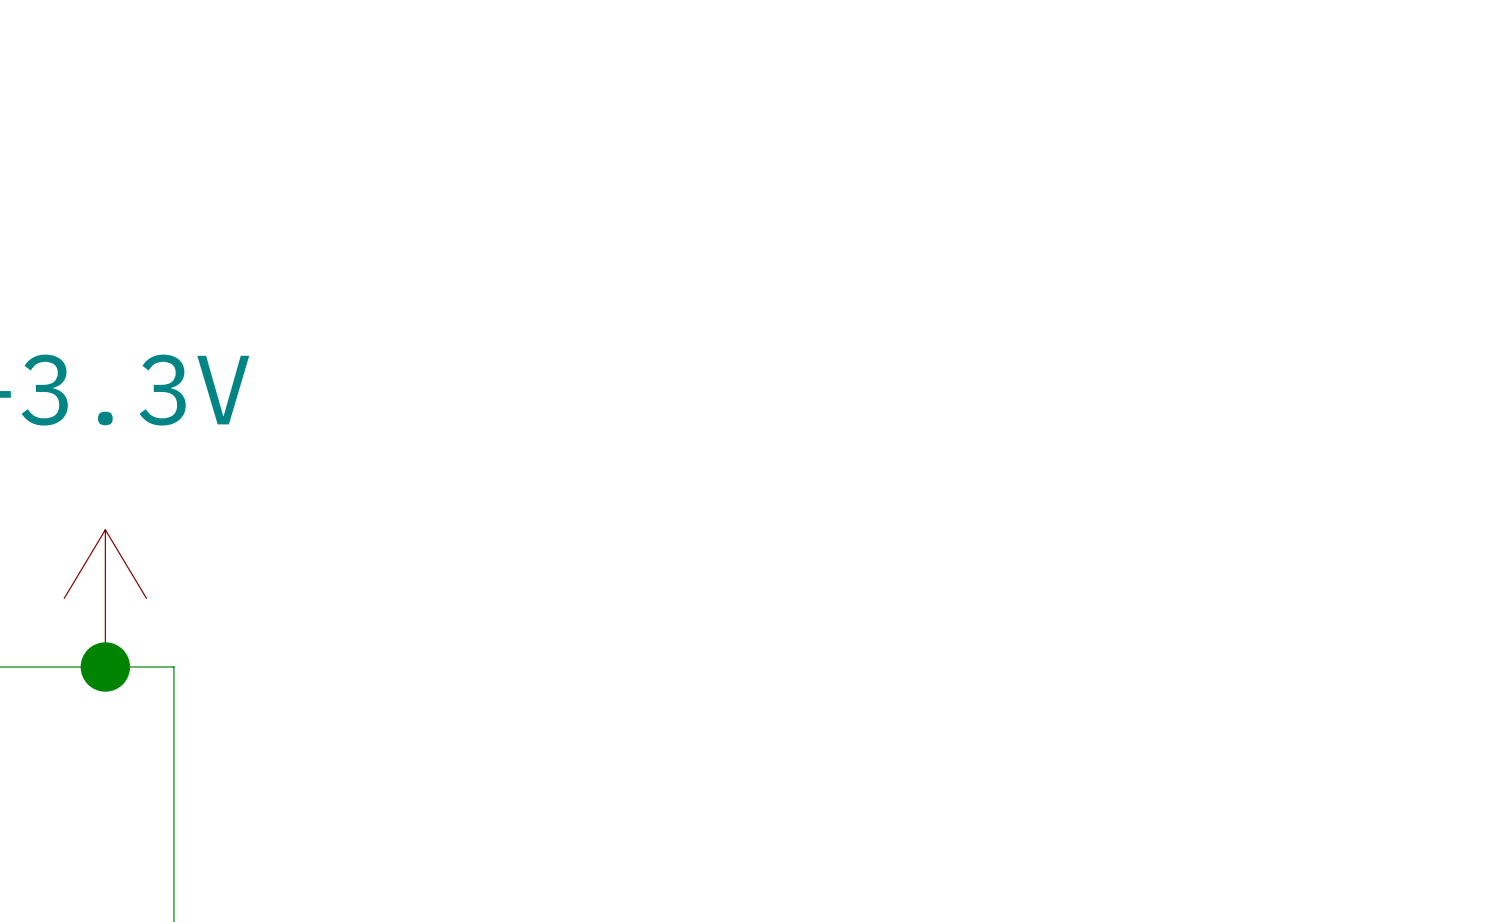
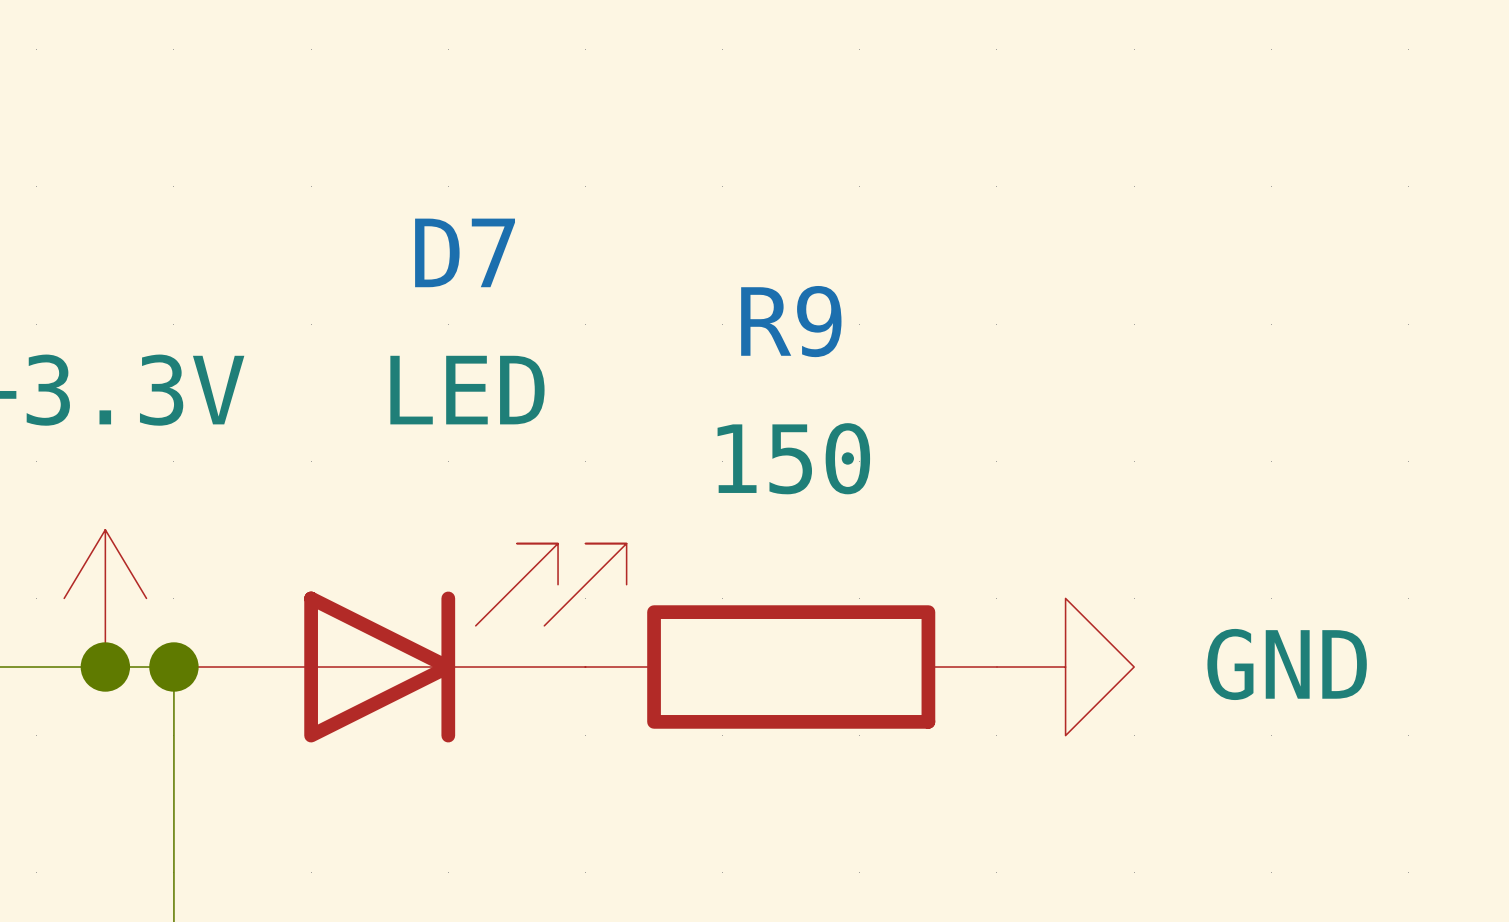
D7: none -> LED (400, 642)
junction: none -> (173, 667)
R9: none -> 150 (791, 667)
power symbol: none -> GND (1065, 667)

